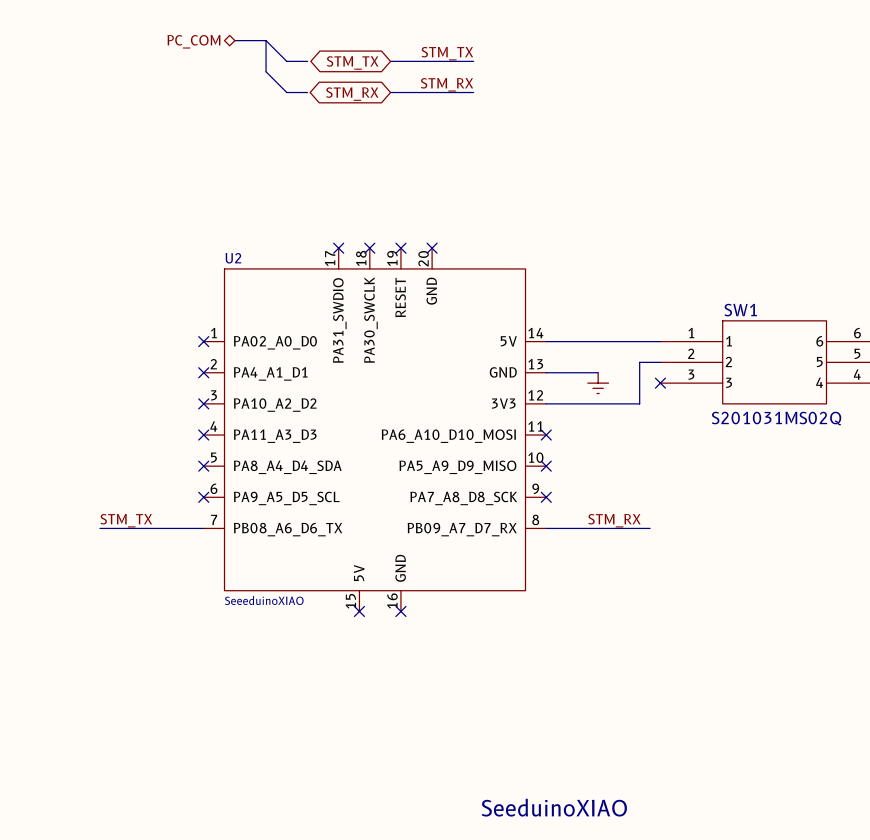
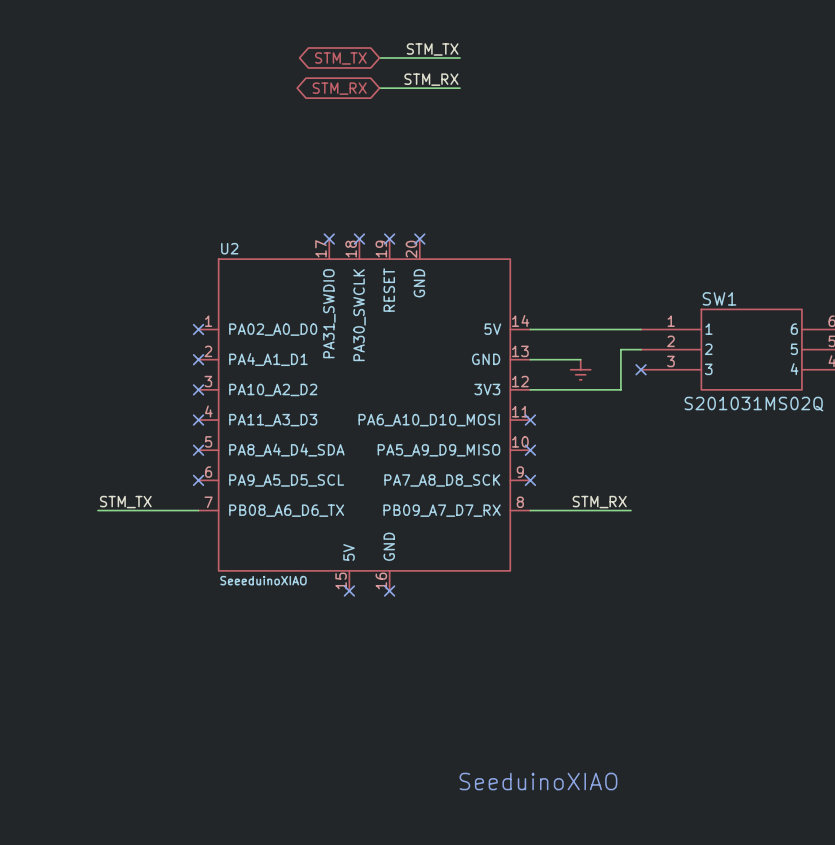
bus: (234, 40) (266, 40) (266, 71) -> none
wire: (266, 40) (286, 61) (307, 61) -> none
hierarchical label: PC_COM (193, 41) -> none
wire: (266, 71) (286, 92) (307, 92) -> none

